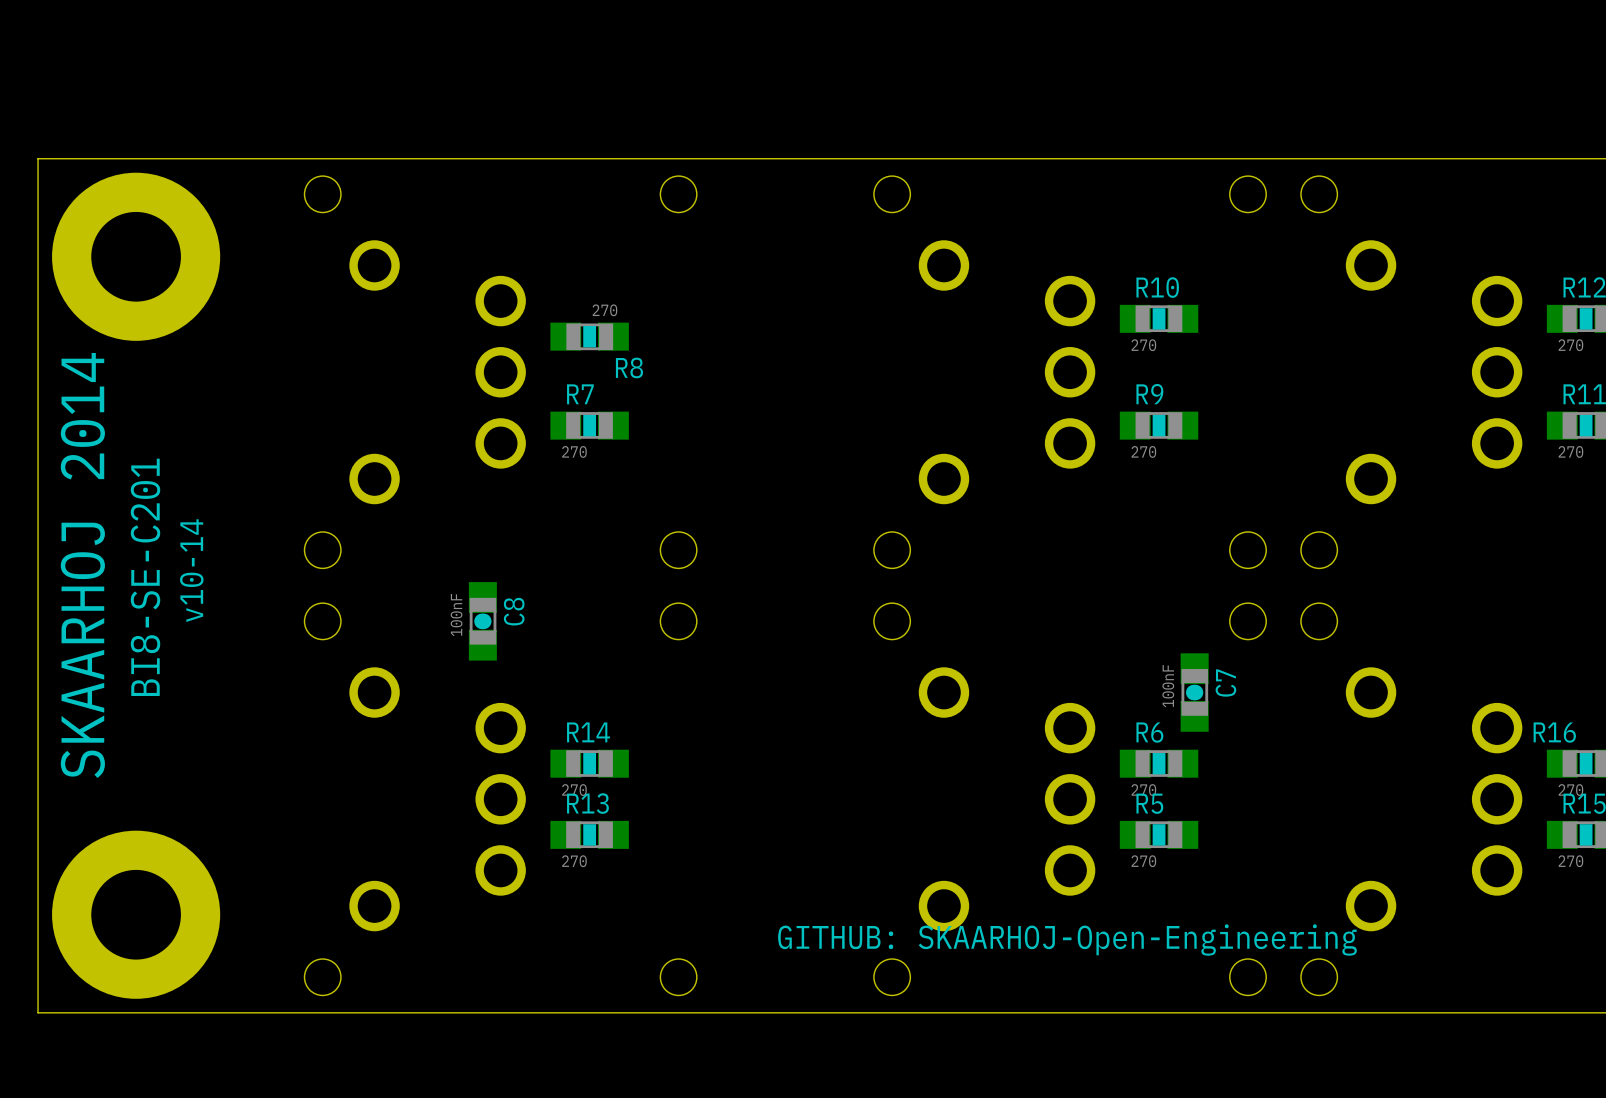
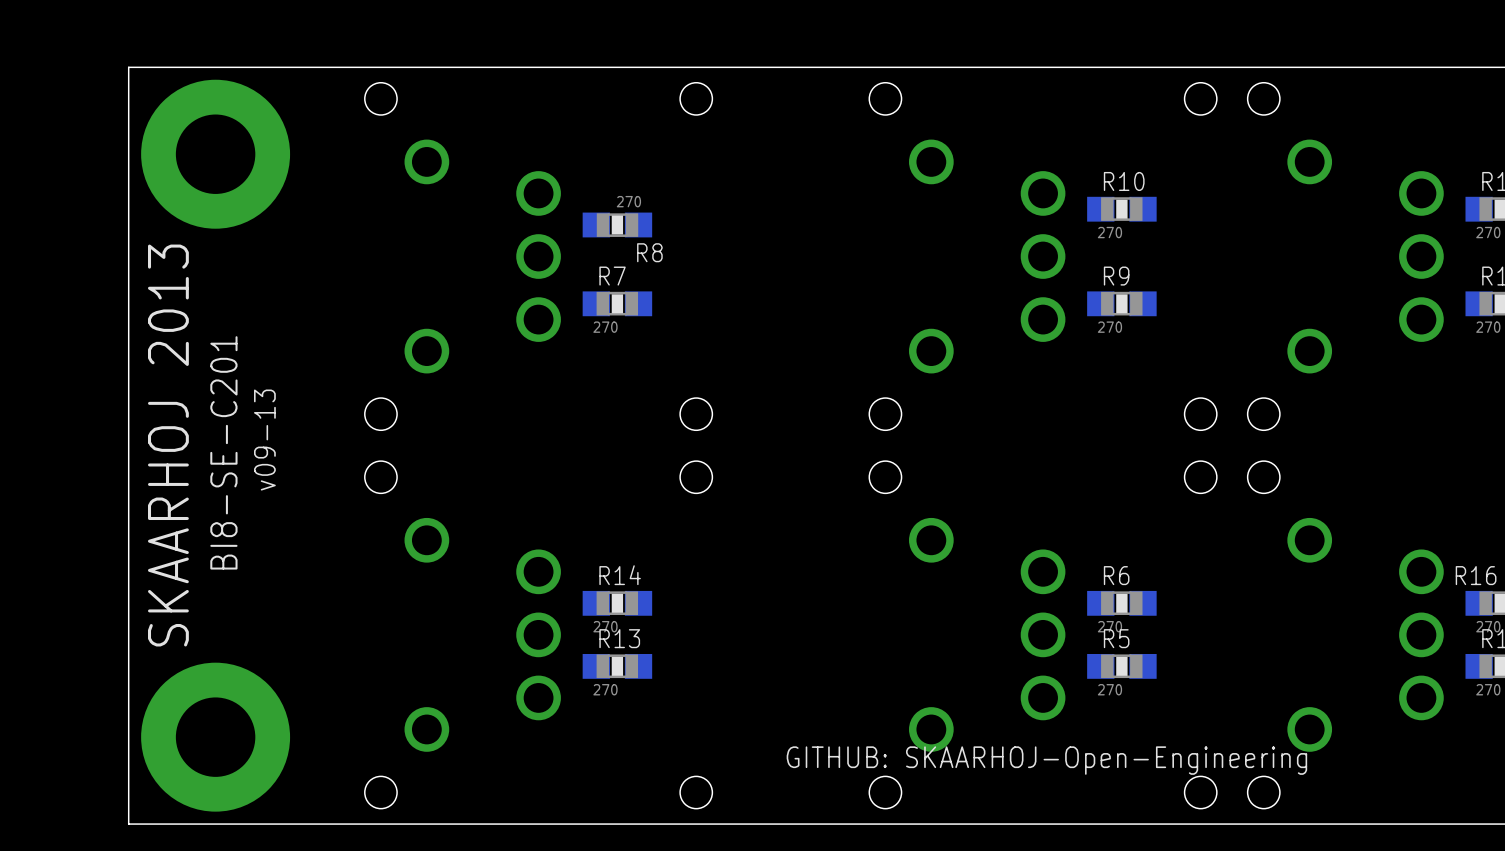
text: SKAARHOJ 2014 (82, 565) -> SKAARHOJ 2013 (168, 445)
text: v10-14 (191, 570) -> v09-13 (264, 440)
C8: 100nF (482, 621) -> none
C7: 100nF (1194, 692) -> none

